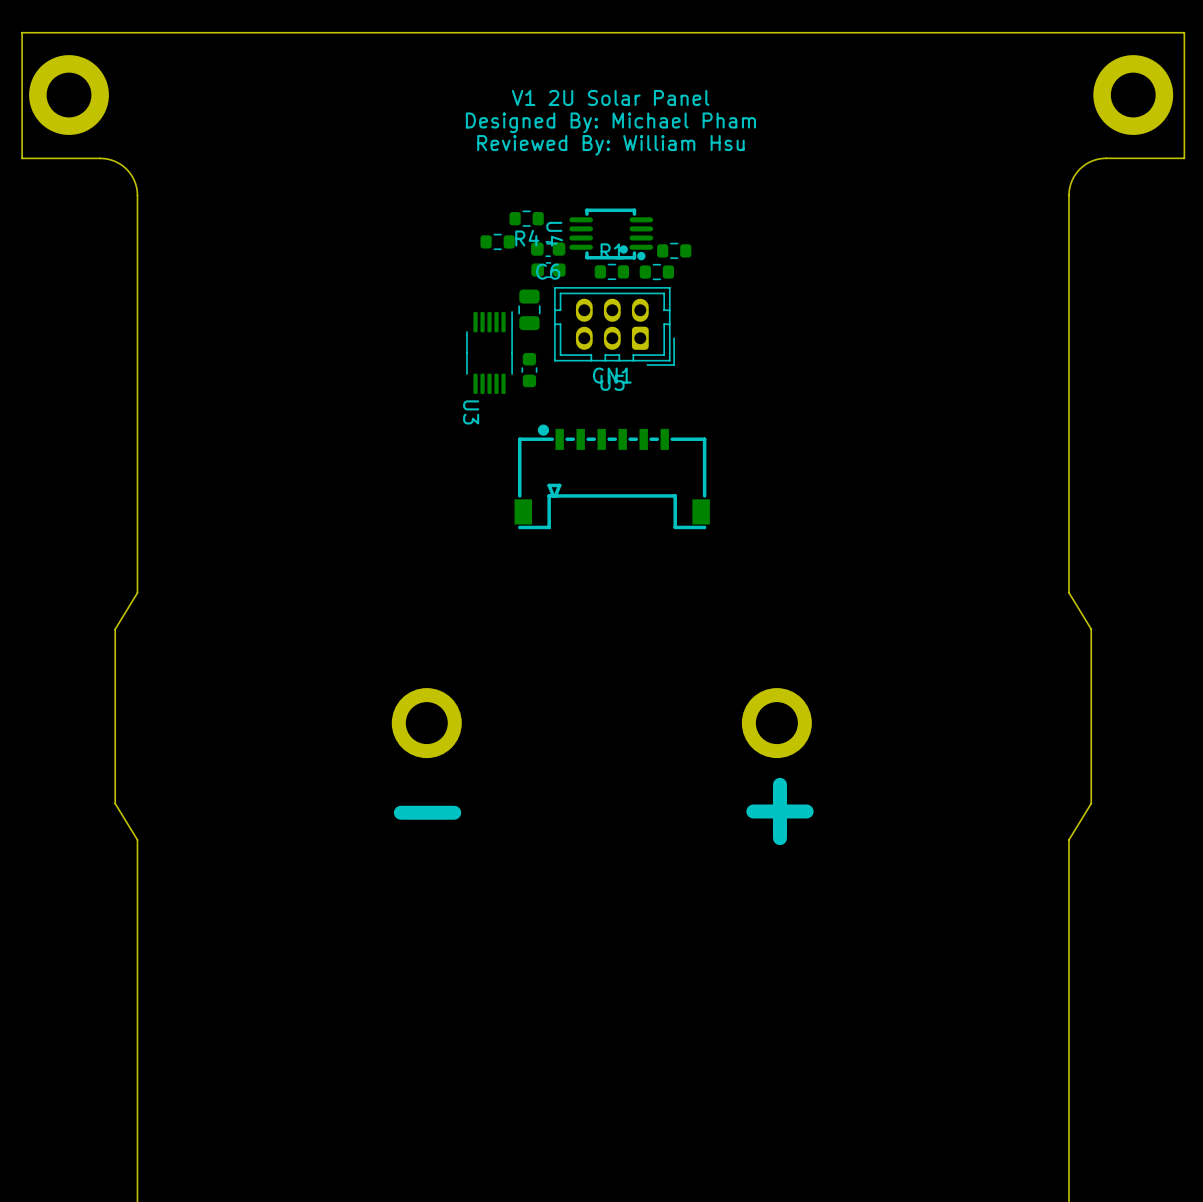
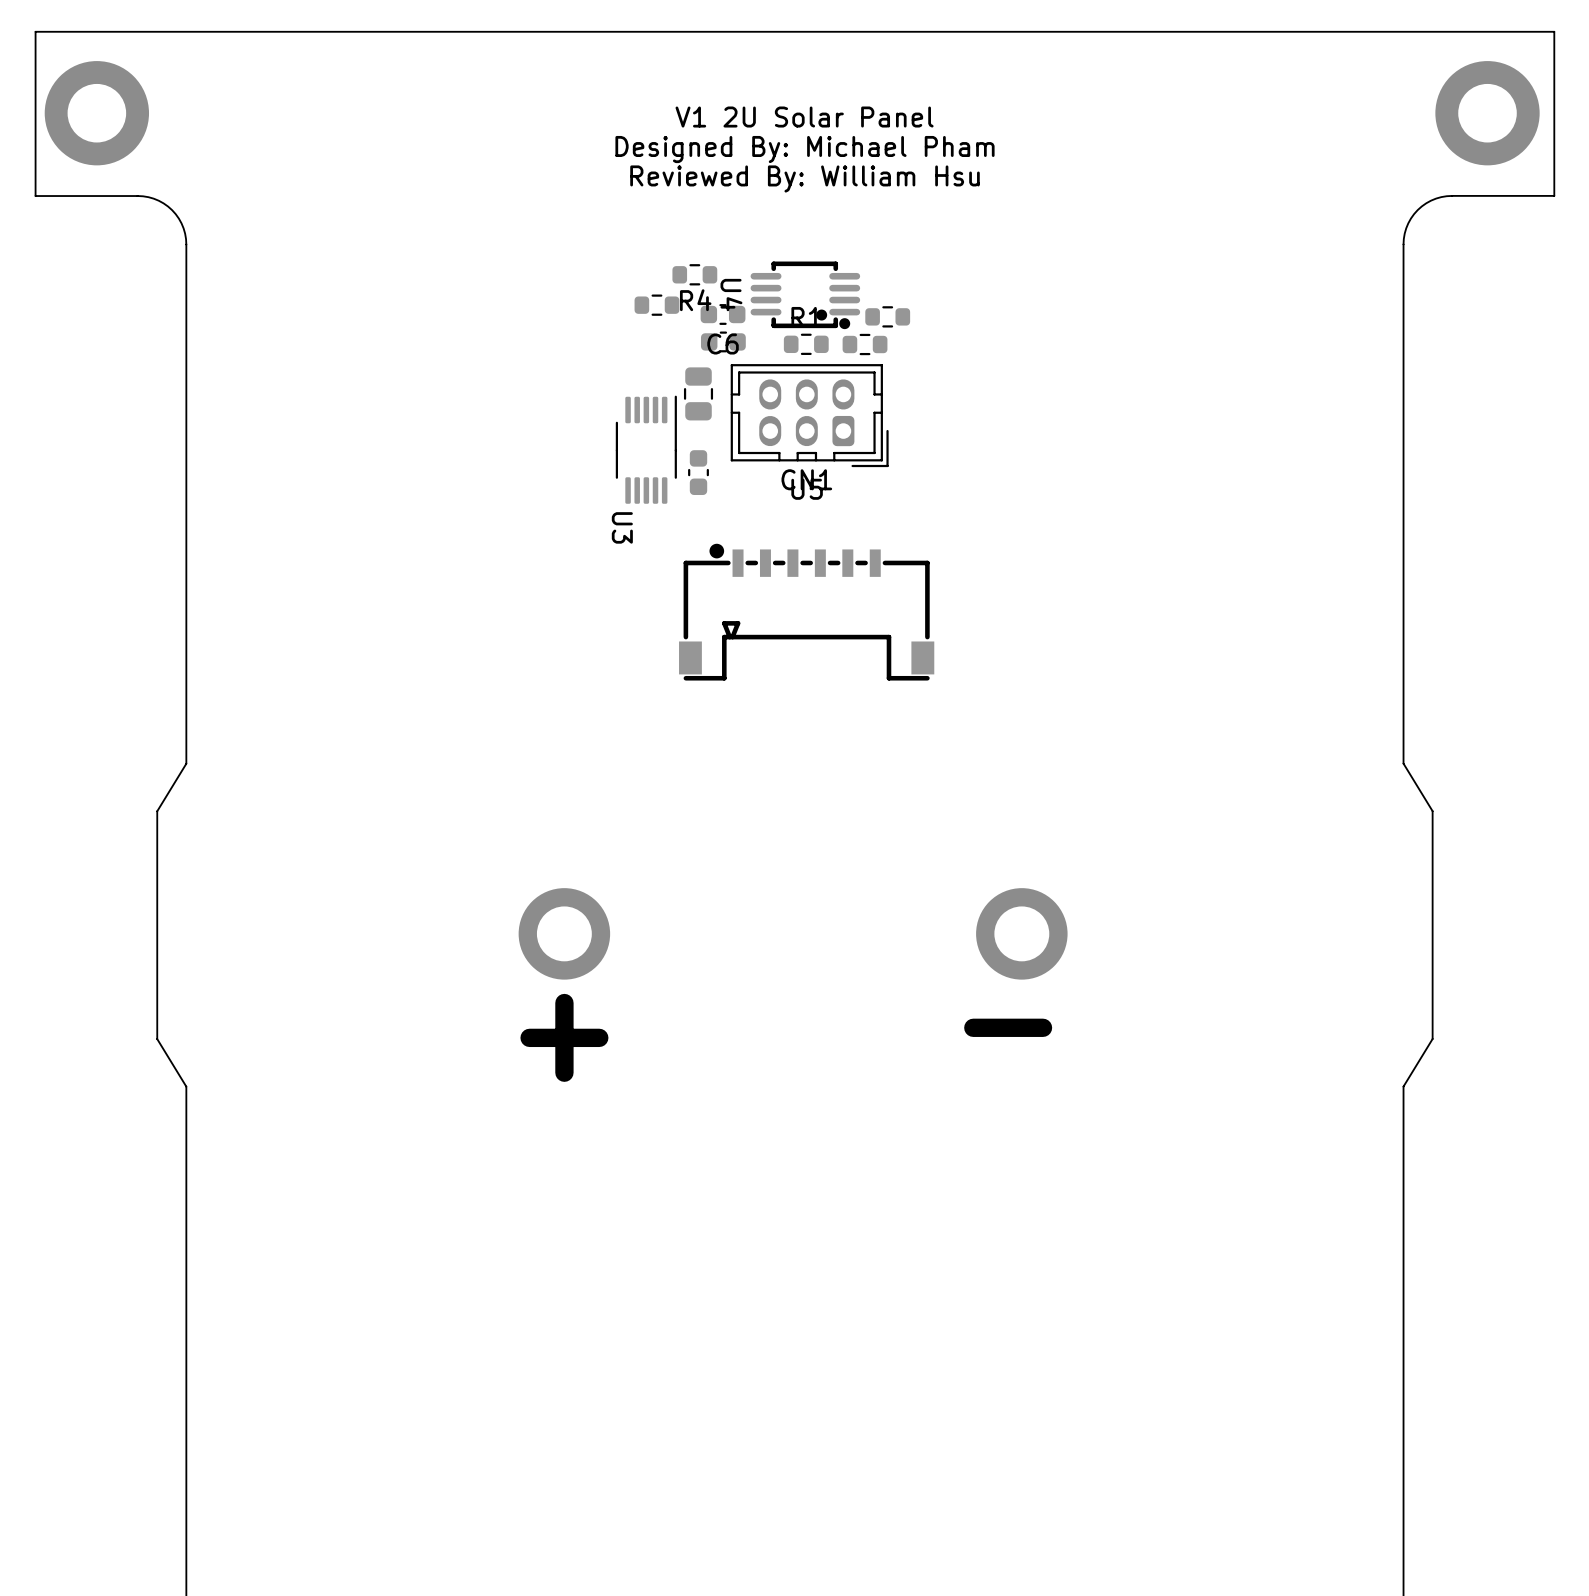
text: none -> - (1008, 1027)
text: + (780, 811) -> none
text: - (427, 812) -> + (564, 1037)

